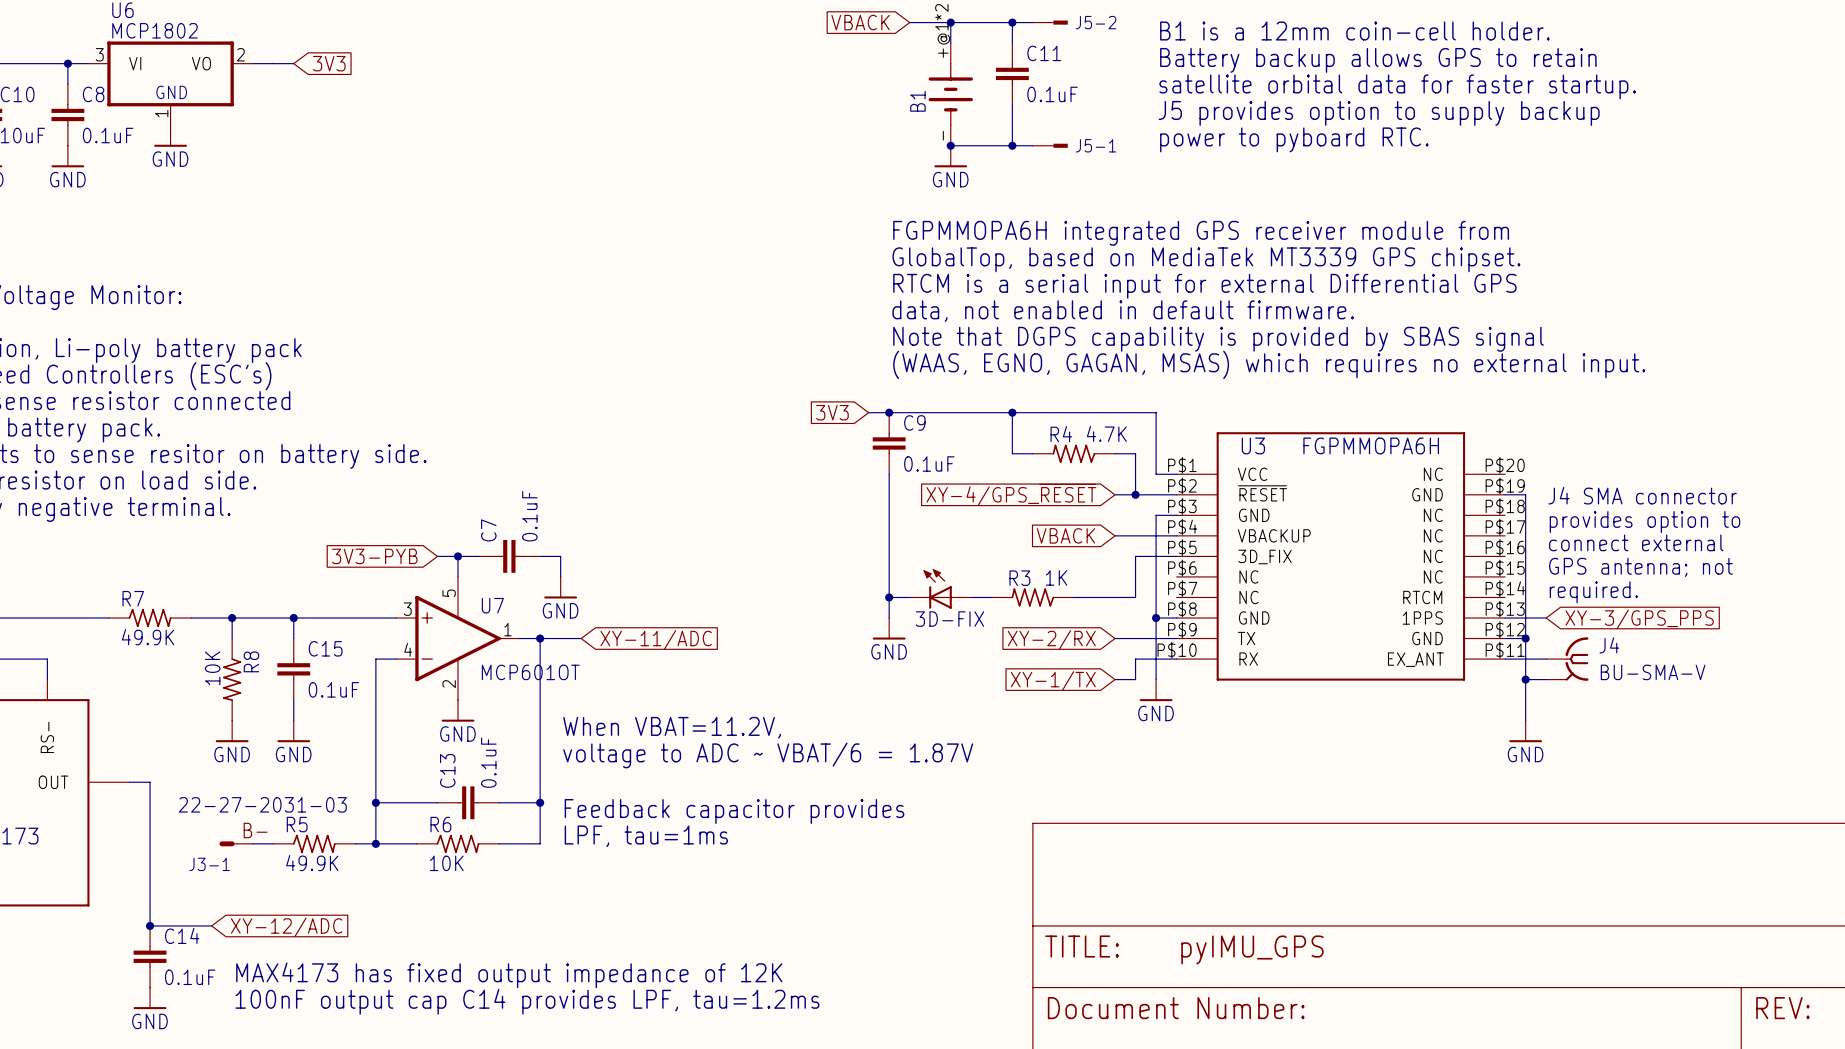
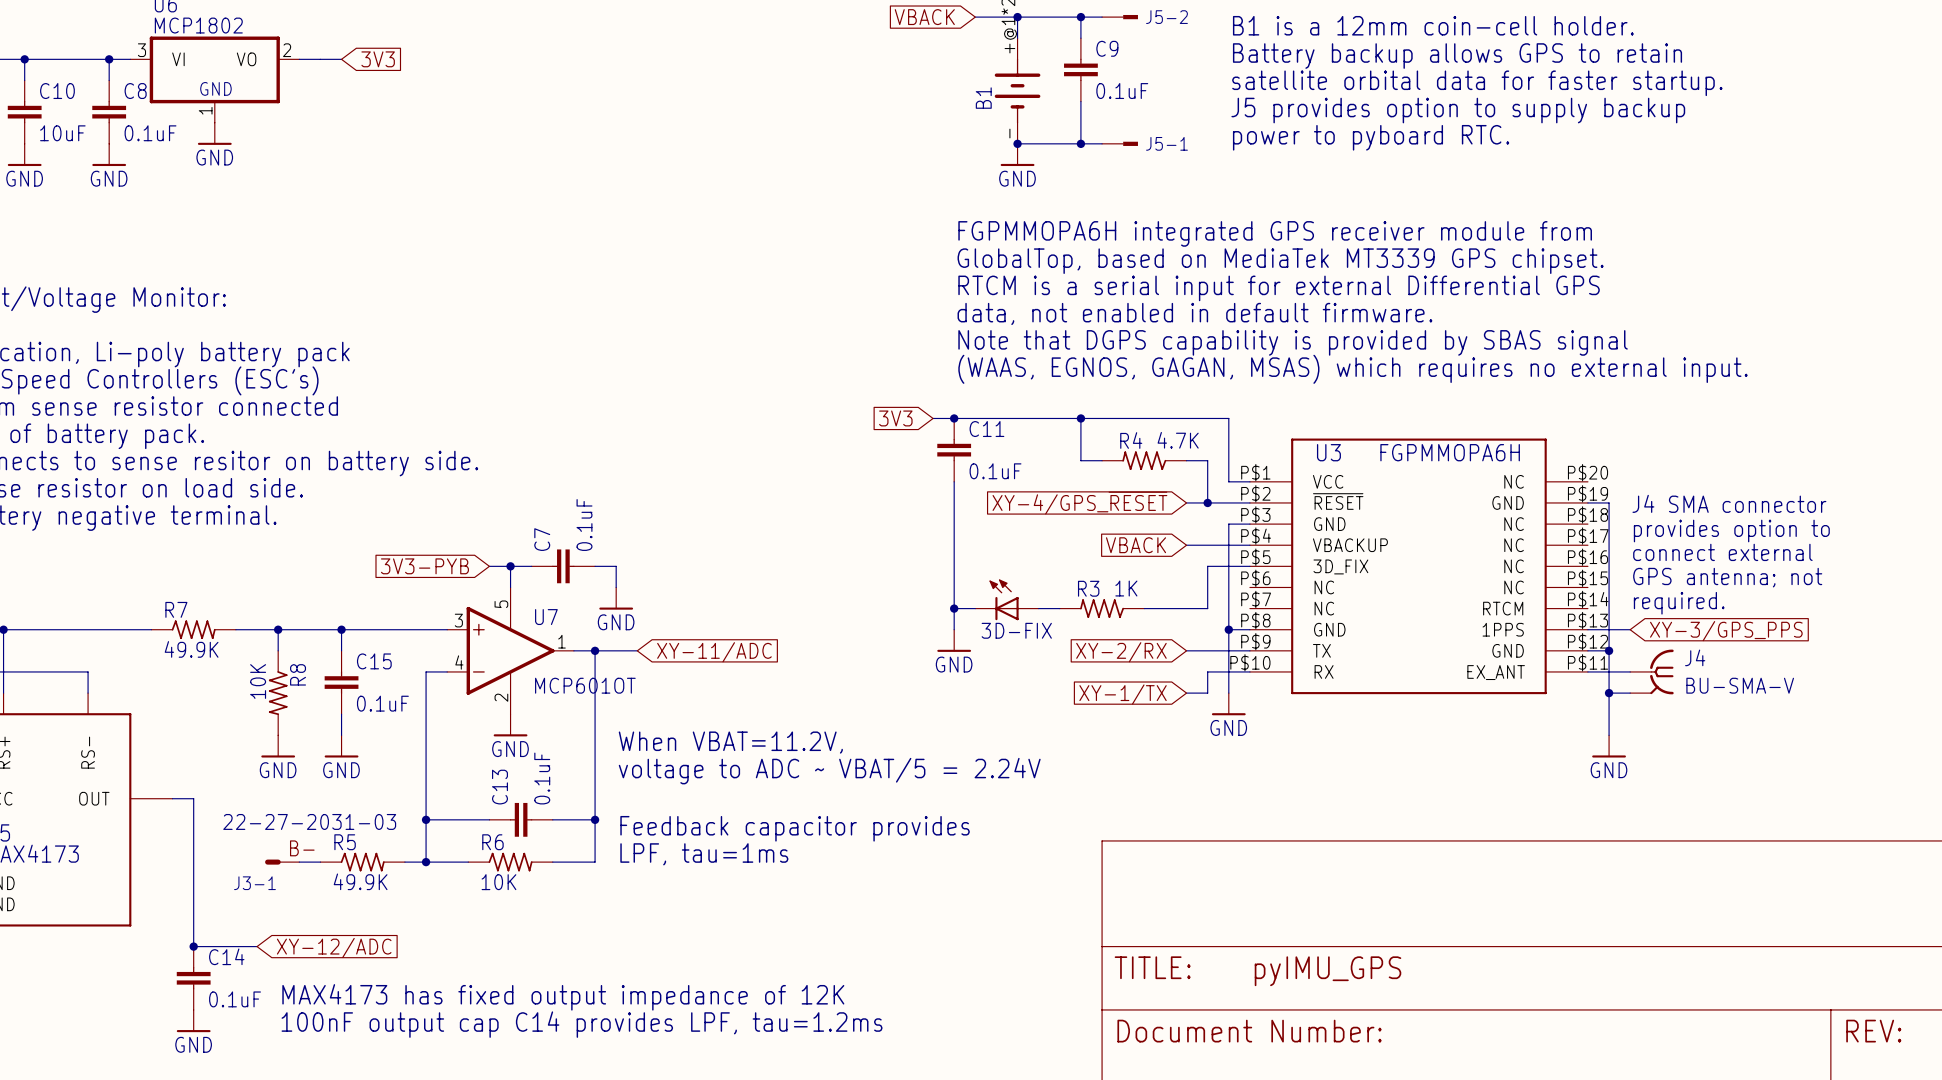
C11 name: C11 (1044, 53) -> C9 (1107, 48)
text: (WAAS, EGNO, GAGAN, MSAS) which requires no external input. (1269, 364) -> (WAAS, EGNOS, GAGAN, MSAS) which requires no external input. (1353, 369)
C9 name: C9 (914, 422) -> C11 (986, 429)
text: voltage to ADC ~ VBAT/6 = 1.87V (768, 755) -> voltage to ADC ~ VBAT/5 = 2.24V (829, 771)

